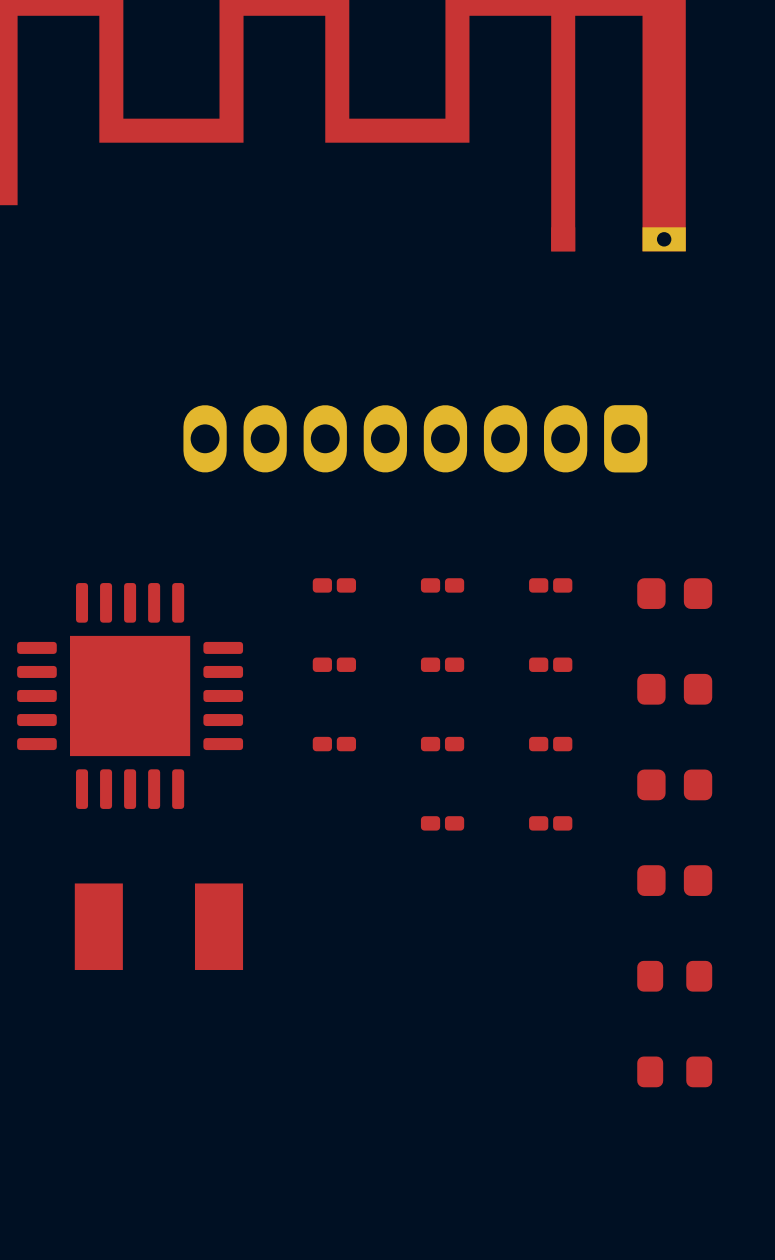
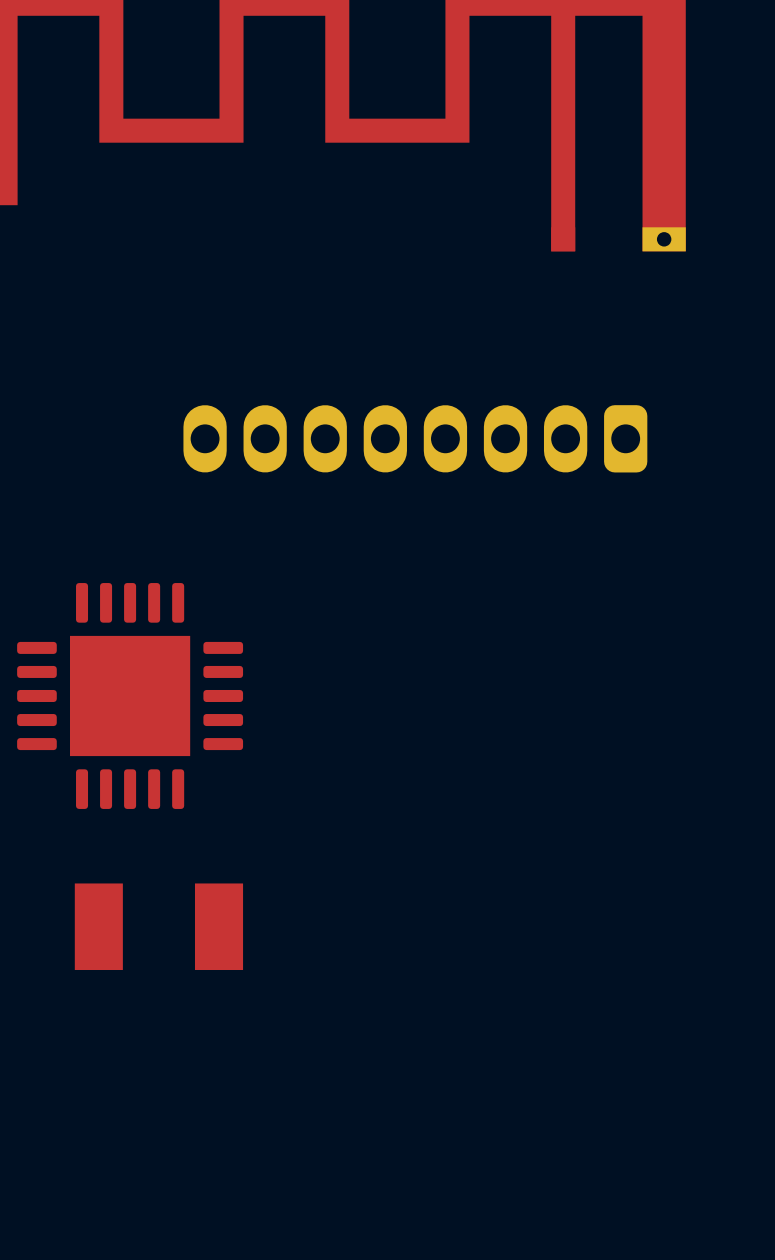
part: (334, 585) -> none
part: (442, 585) -> none
part: (550, 585) -> none
part: (674, 593) -> none
part: (334, 664) -> none
part: (442, 664) -> none
part: (550, 664) -> none
part: (674, 689) -> none
part: (334, 744) -> none
part: (442, 744) -> none
part: (550, 744) -> none
part: (674, 784) -> none
part: (442, 823) -> none
part: (550, 823) -> none
part: (674, 880) -> none
part: (674, 976) -> none
part: (674, 1071) -> none

